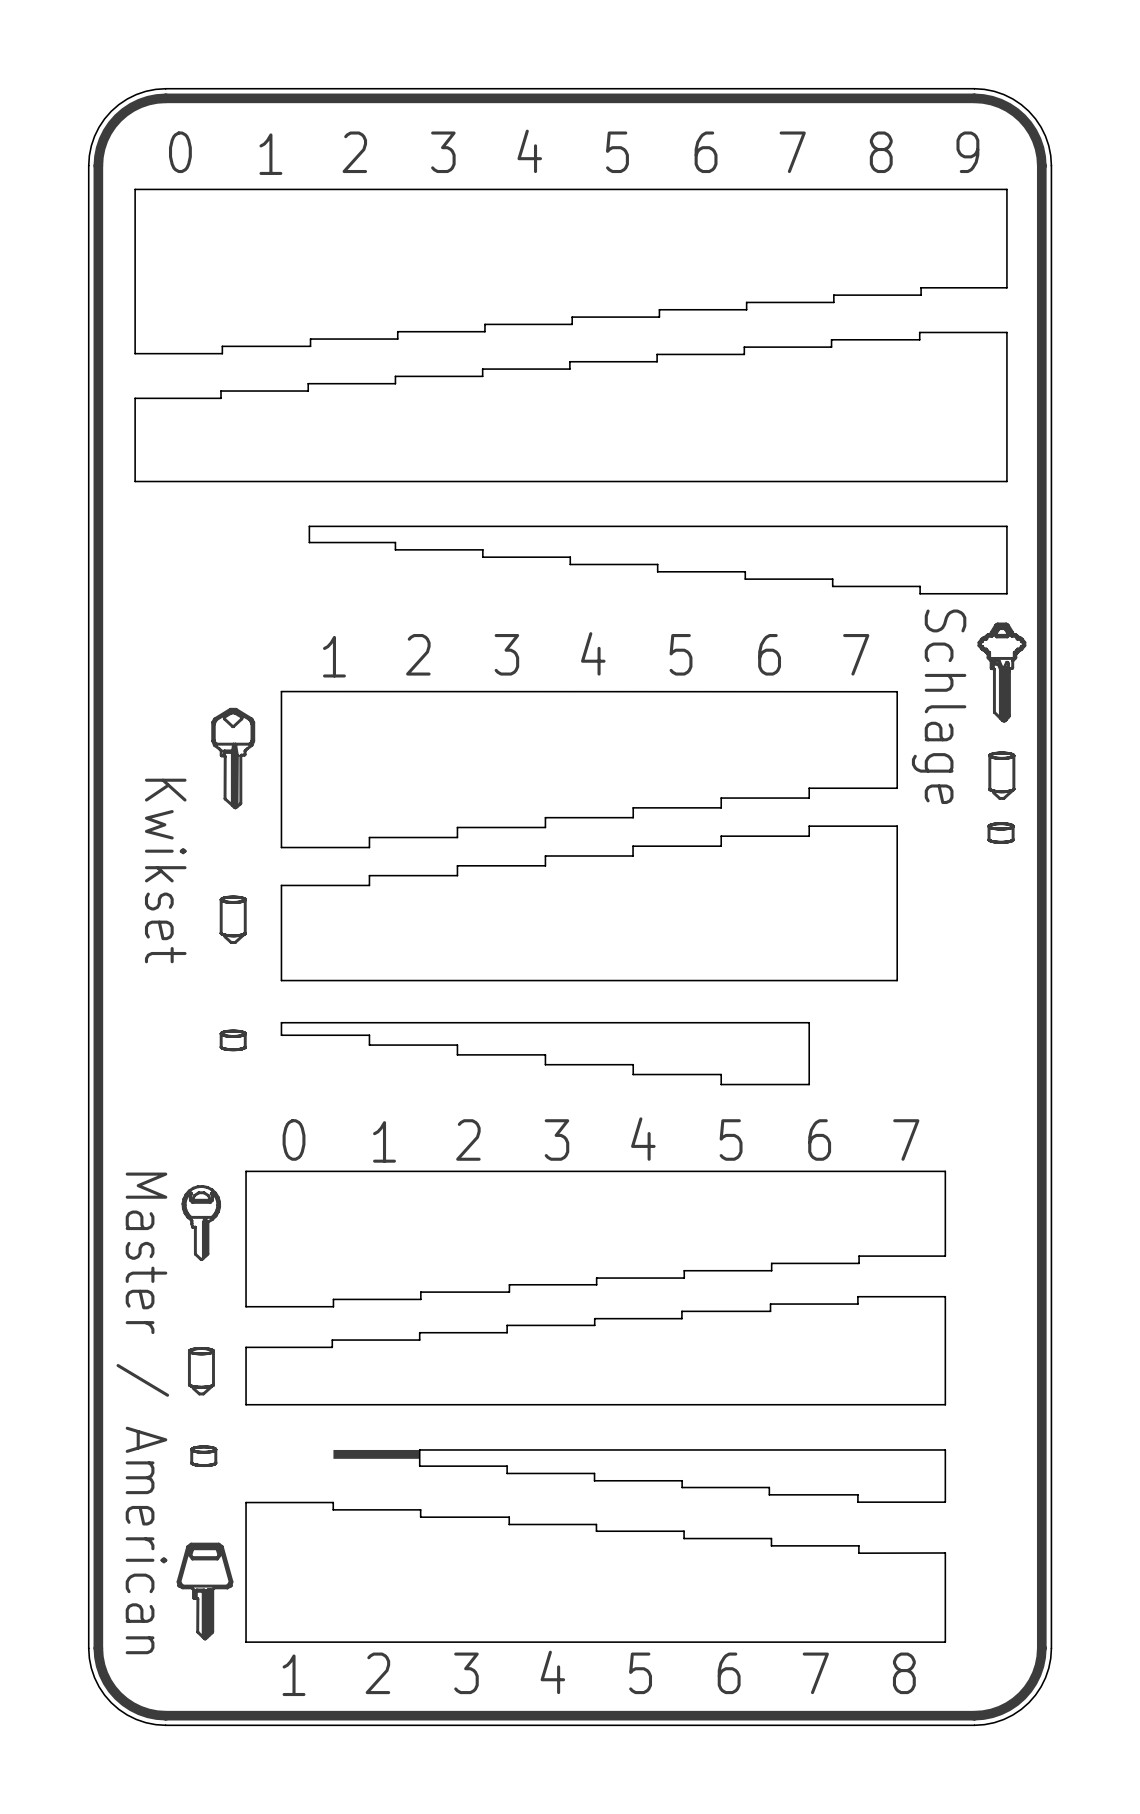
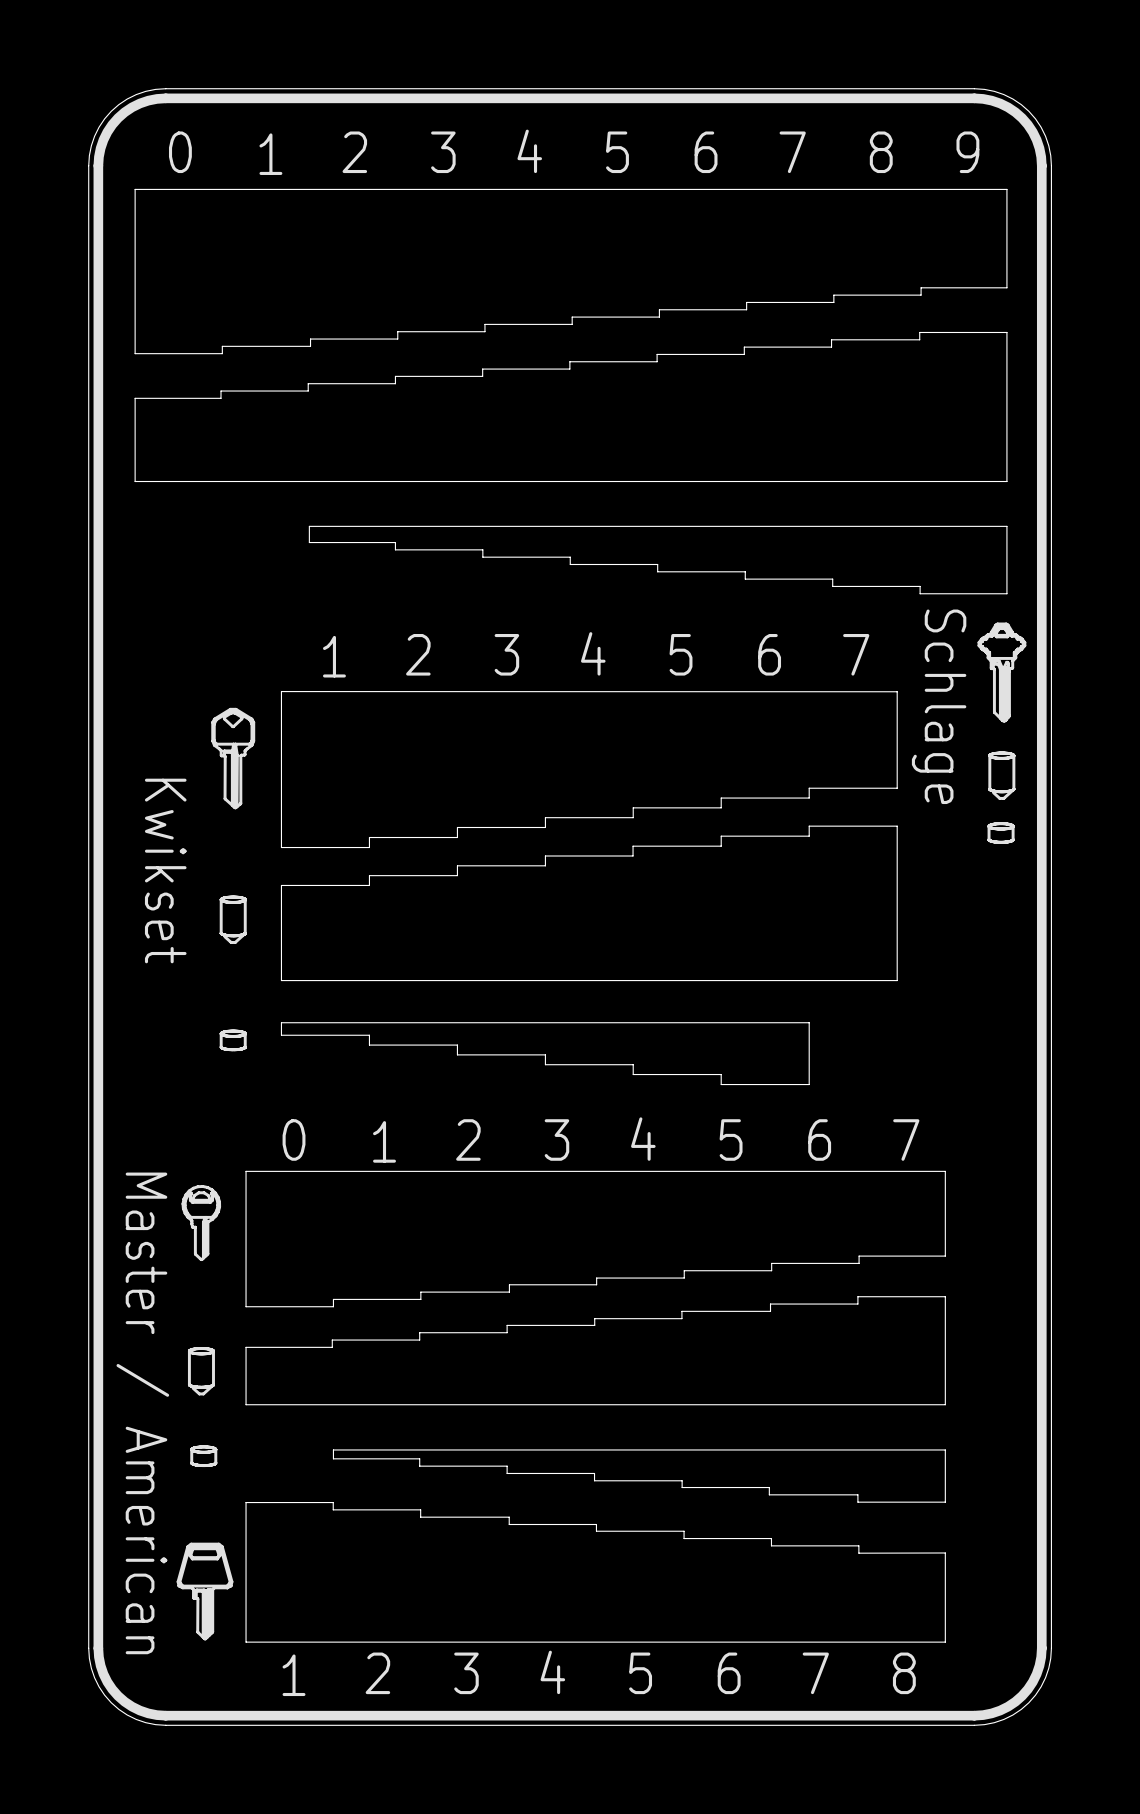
drawing: [333, 1449, 420, 1459] -> none
board edge: (419, 1449) (419, 1458) -> (419, 1449) (333, 1449) (333, 1458) (419, 1458)

